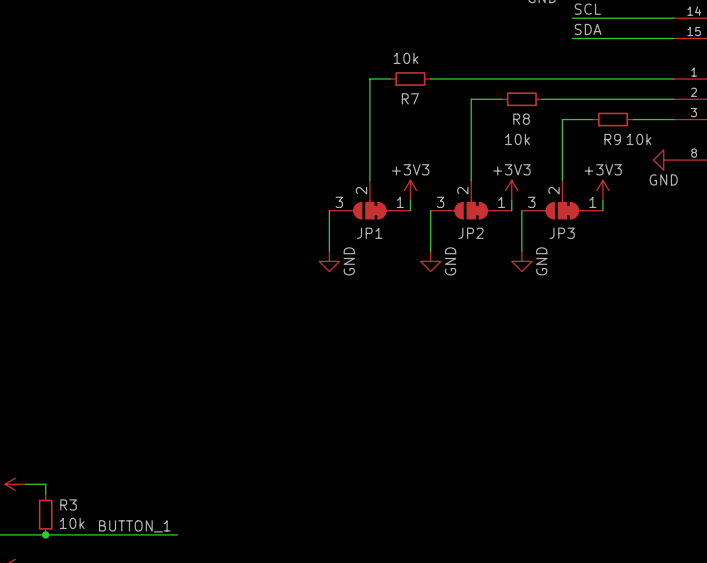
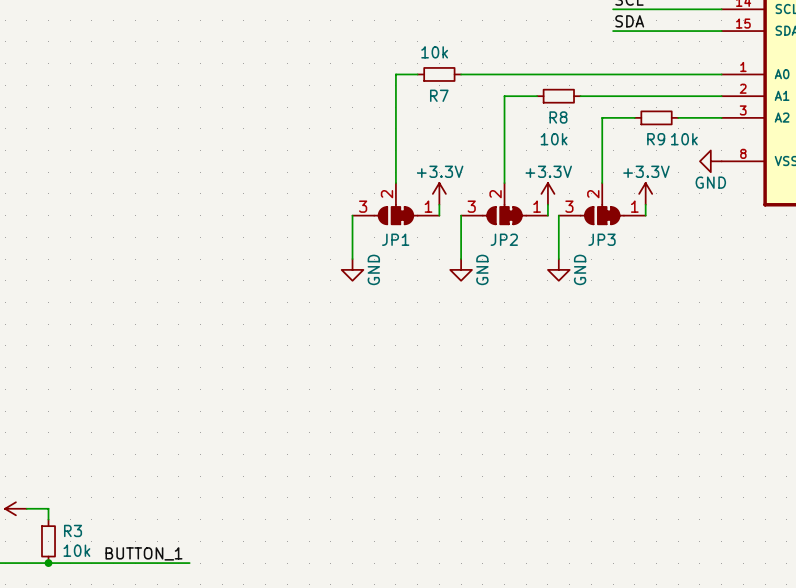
power symbol: +3V3 (410, 190) -> +3.3V (439, 193)
power symbol: +3V3 (511, 190) -> +3.3V (547, 193)
power symbol: +3V3 (602, 190) -> +3.3V (645, 193)

